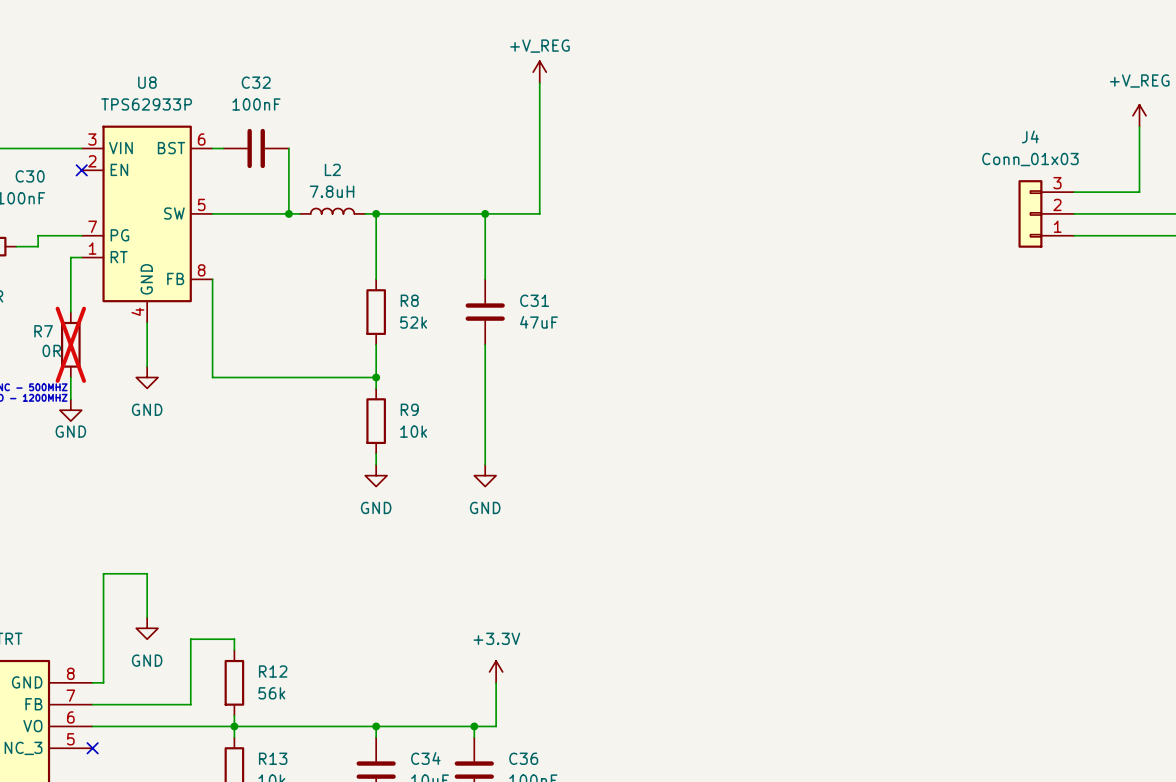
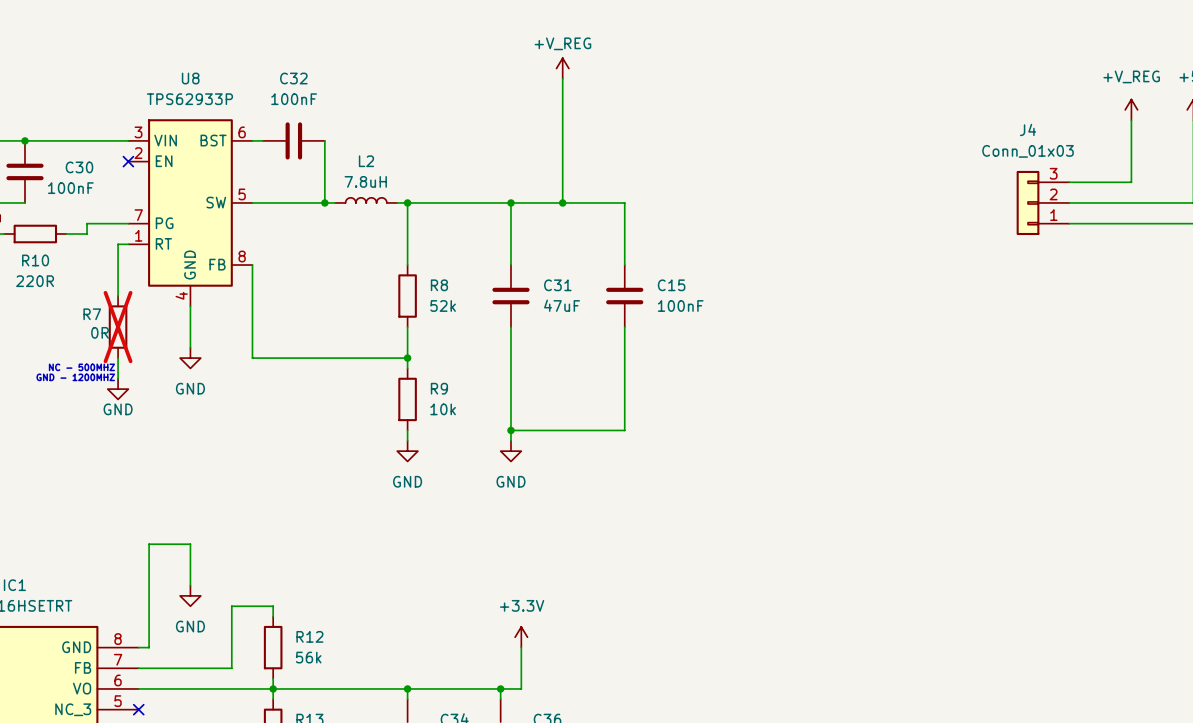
wire: none -> (562, 202) (624, 202) (624, 265)
junction: none -> (562, 202)
C15: none -> 100nF (624, 296)
wire: none -> (624, 327) (624, 430) (510, 430)
junction: none -> (510, 430)

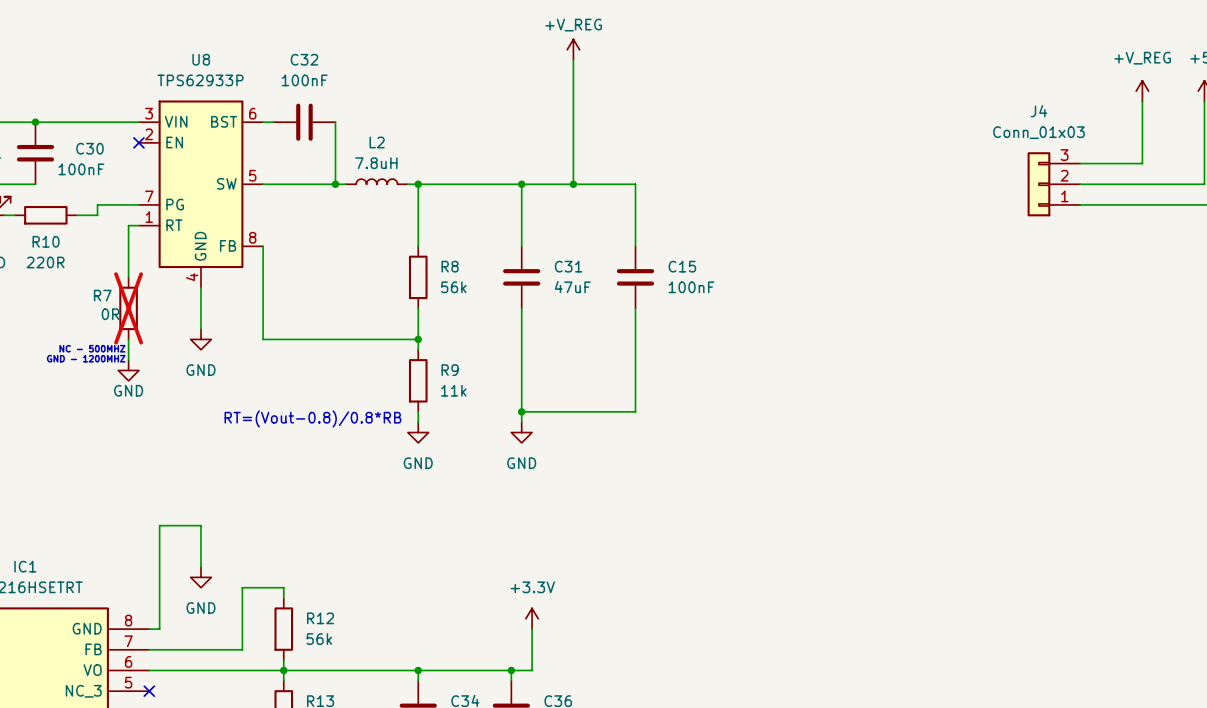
R8 value: 52k (443, 305) -> 56k (453, 287)
R9 value: 10k (443, 409) -> 11k (453, 390)
text: none -> RT=(Vout-0.8)/0.8*RB (312, 418)

